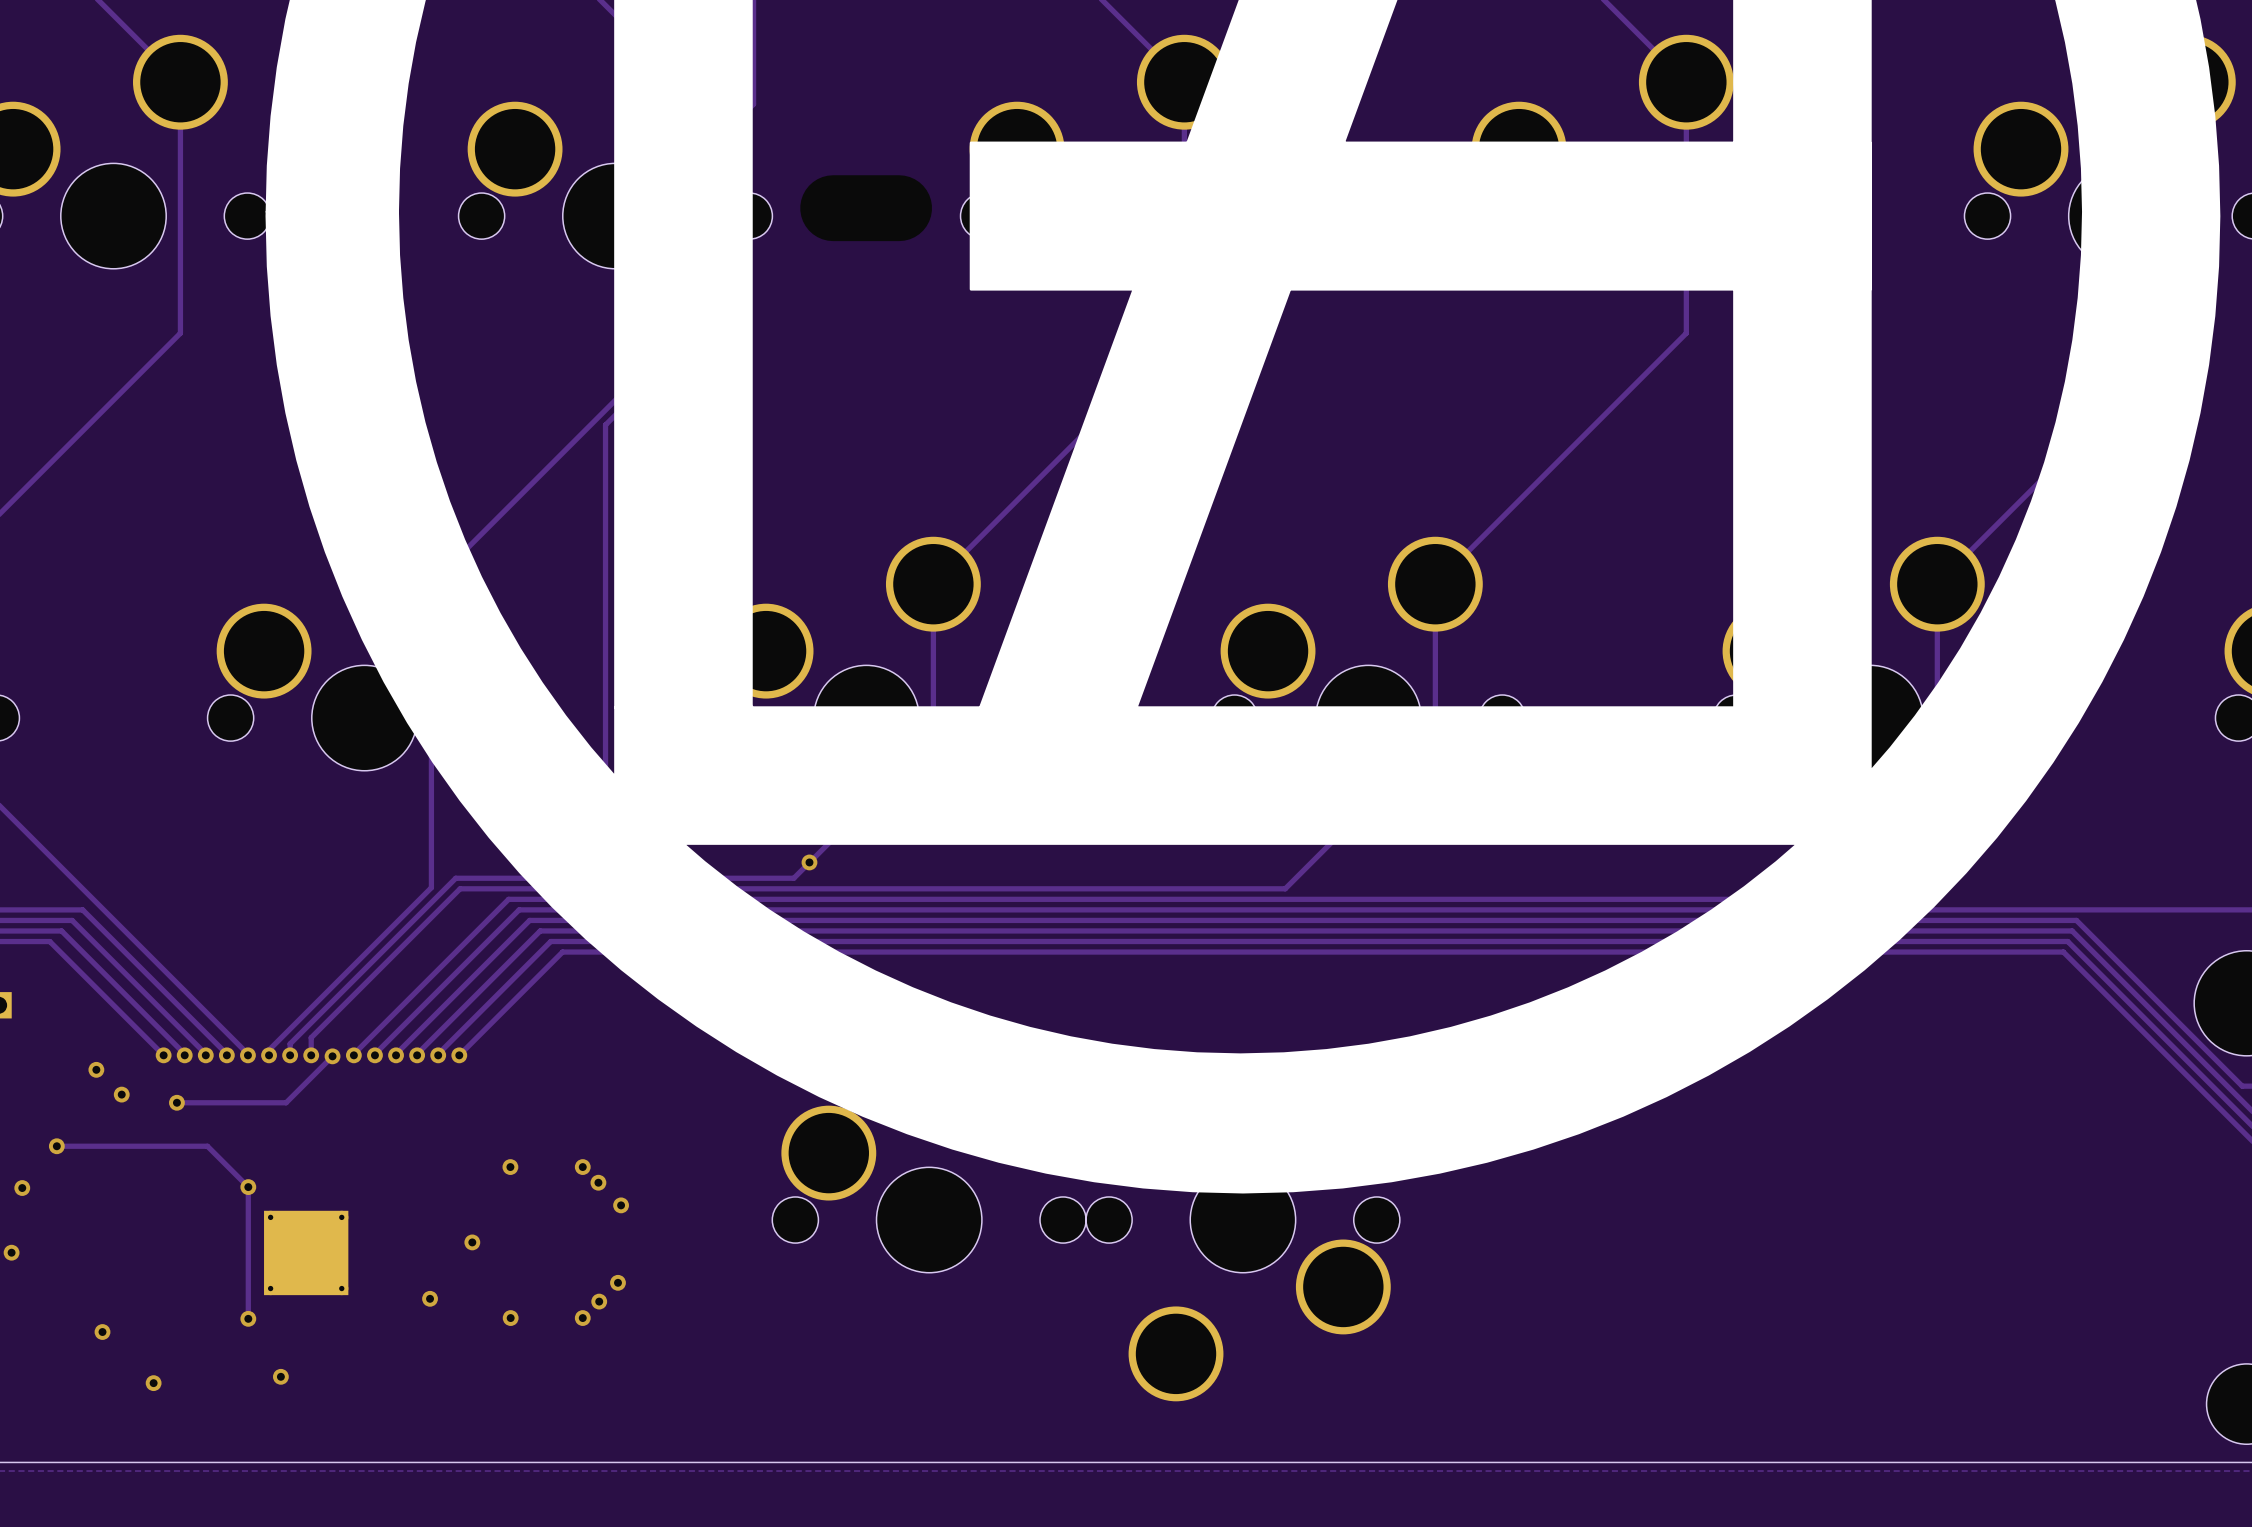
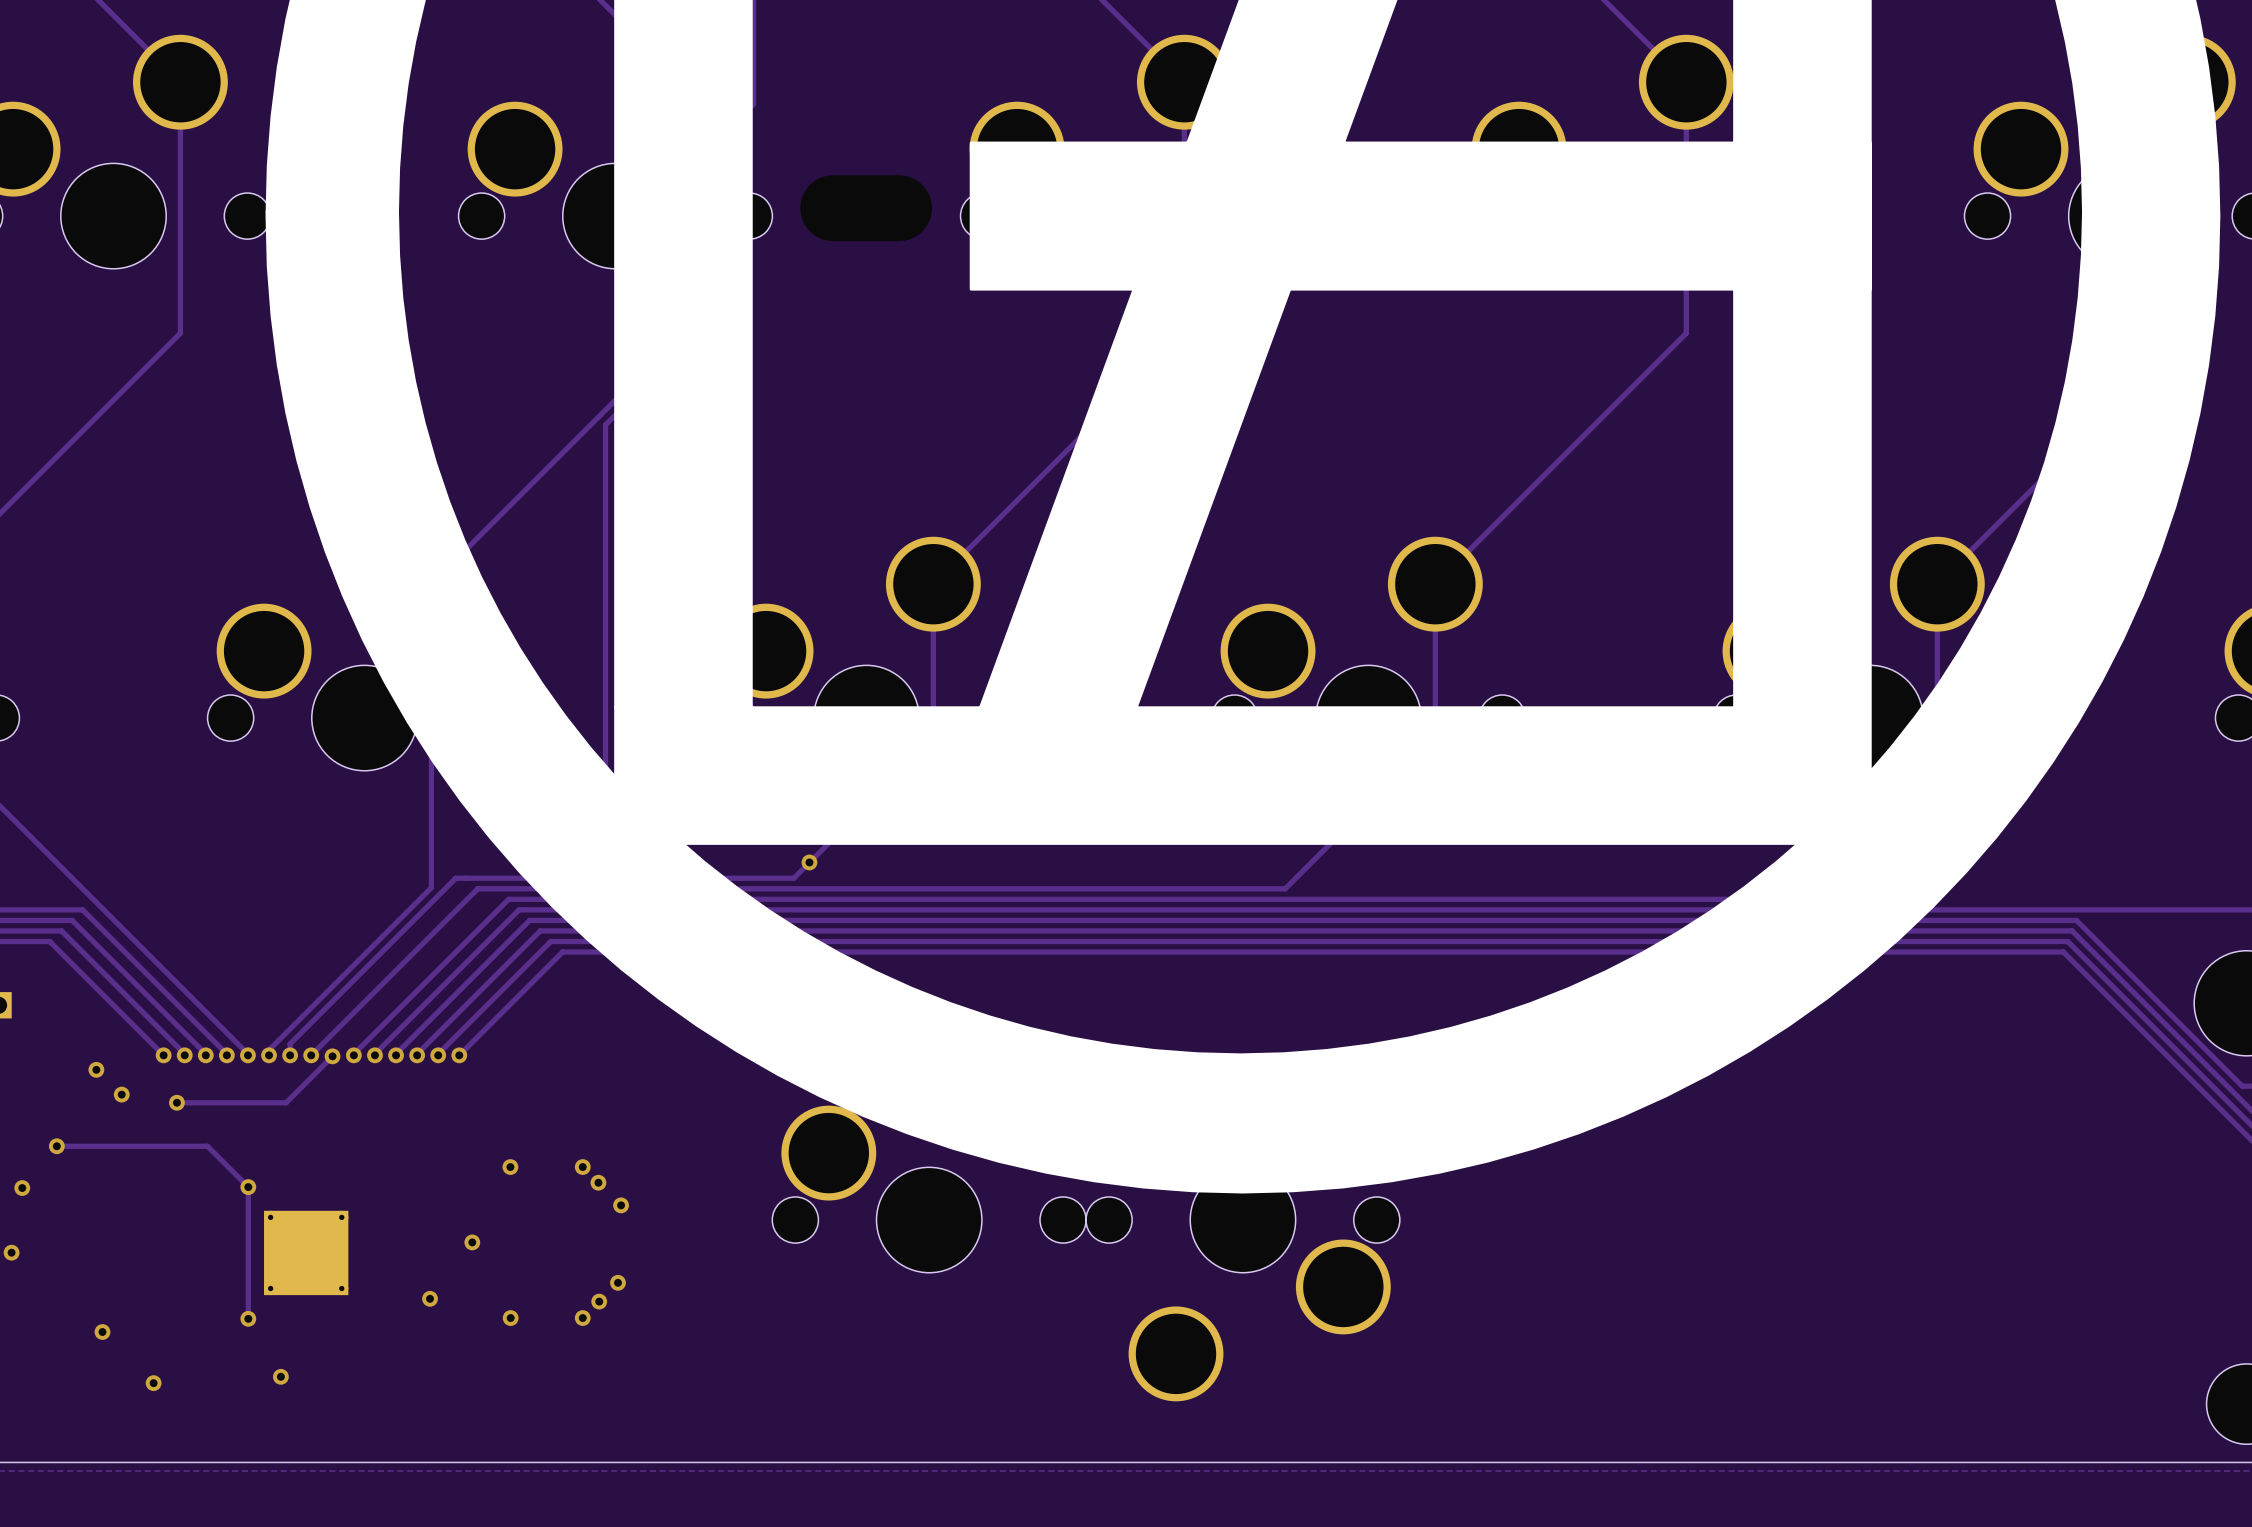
track: (477, 888) (460, 888) (311, 1037) (311, 1055) -> (477, 888) (311, 1055)

